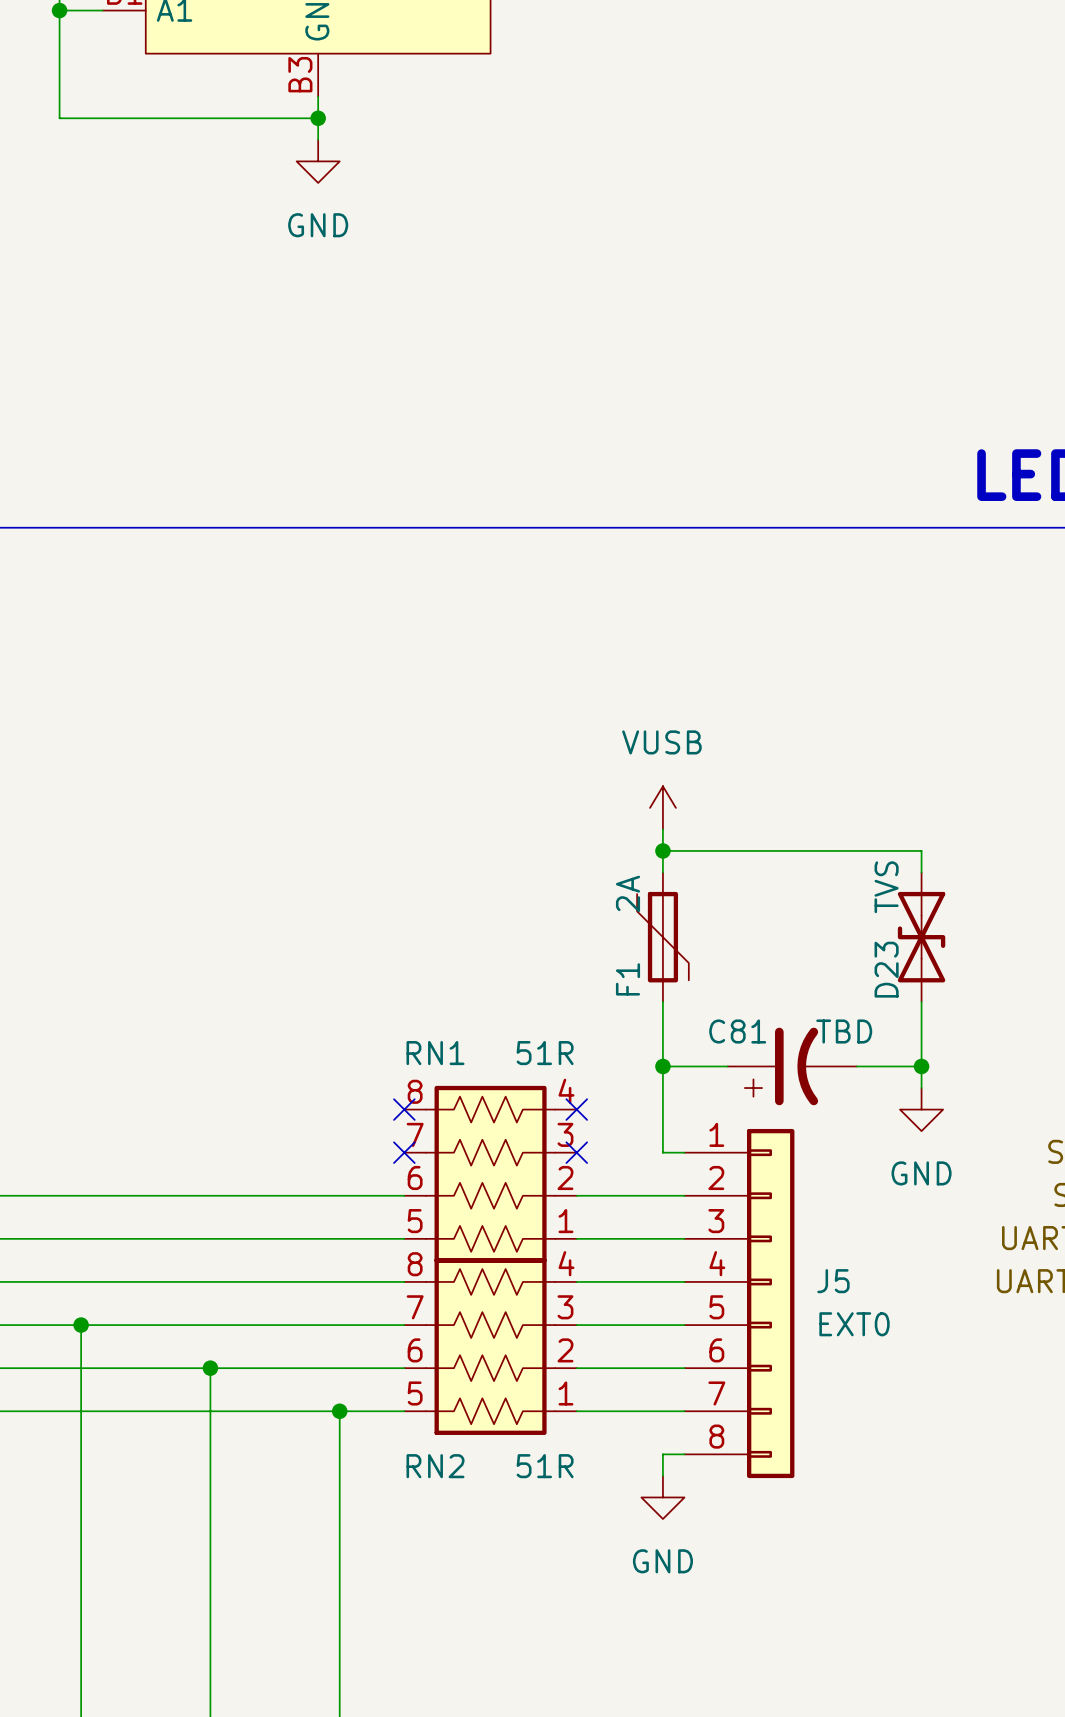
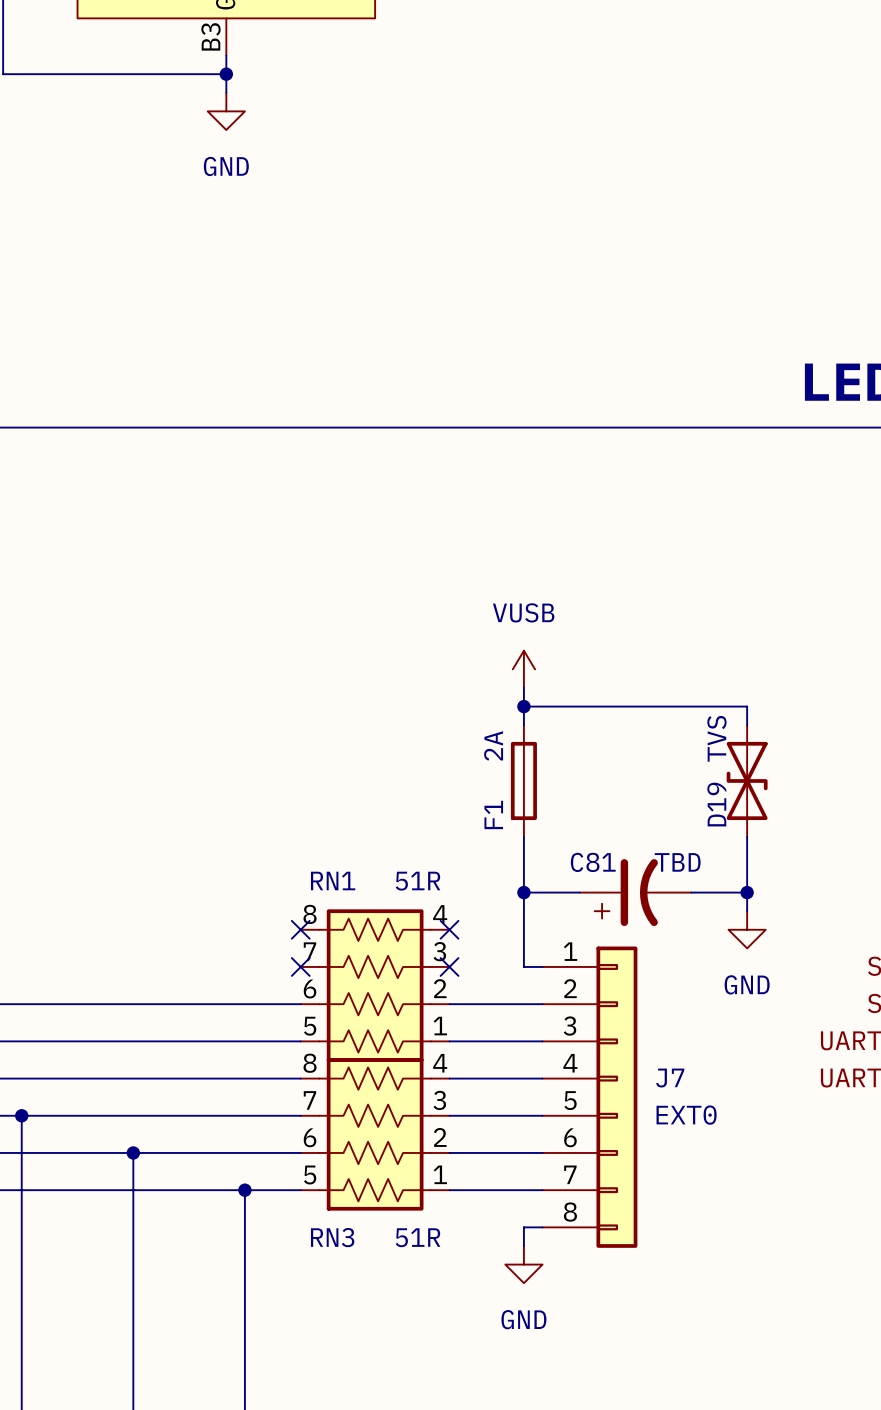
F1 symbol: [637, 872, 689, 1002] -> [510, 725, 537, 837]
D23 name: D23 (886, 969) -> D19 (716, 804)
J5 name: J5 (833, 1281) -> J7 (670, 1078)
RN2 name: RN2 (435, 1466) -> RN3 (332, 1237)

